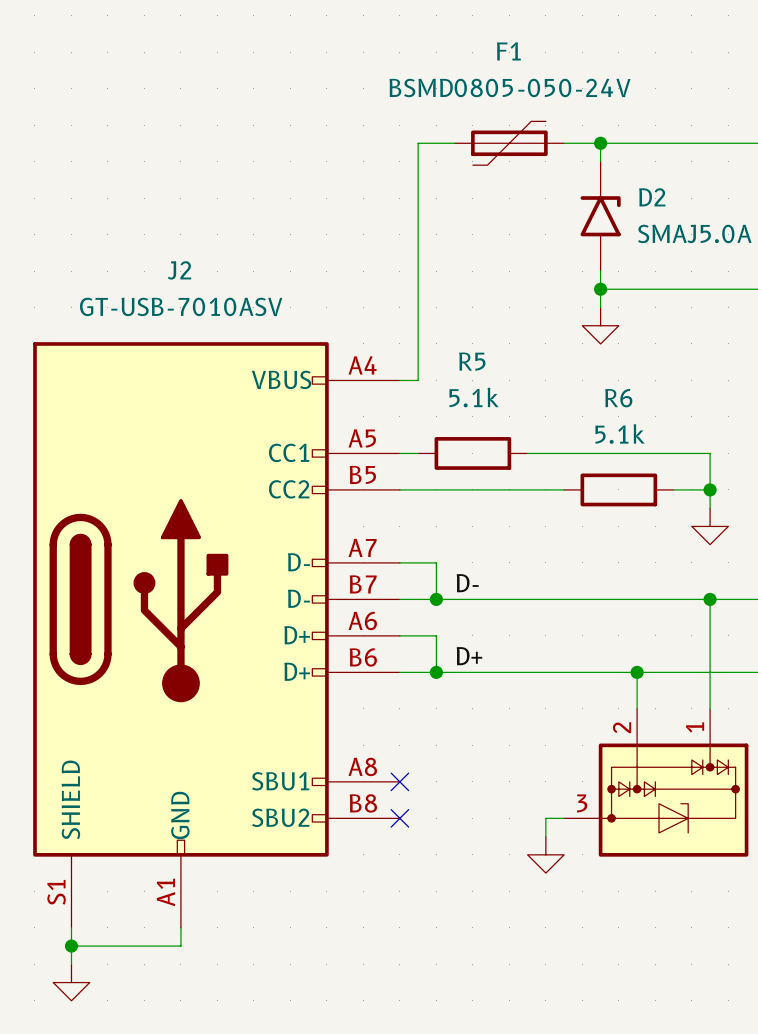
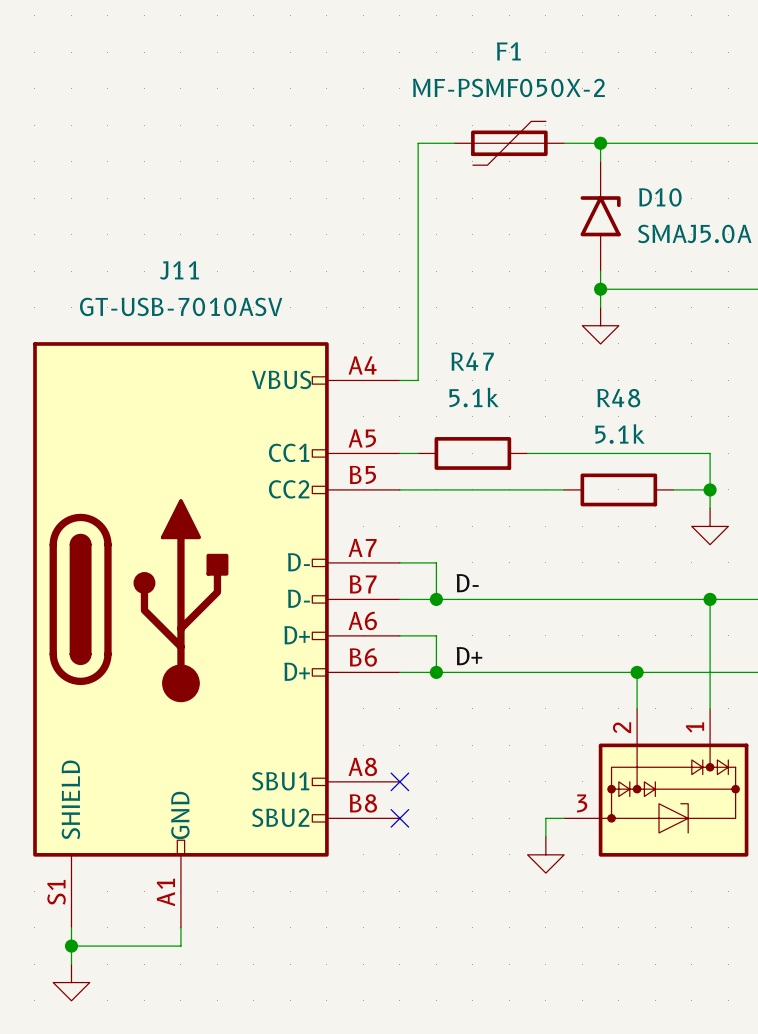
F1 value: BSMD0805-050-24V (509, 87) -> MF-PSMF050X-2 (508, 87)
D2 name: D2 (652, 197) -> D10 (660, 197)
J2 name: J2 (179, 270) -> J11 (179, 270)
R5 name: R5 (472, 361) -> R47 (472, 361)
R6 name: R6 (618, 398) -> R48 (618, 398)

